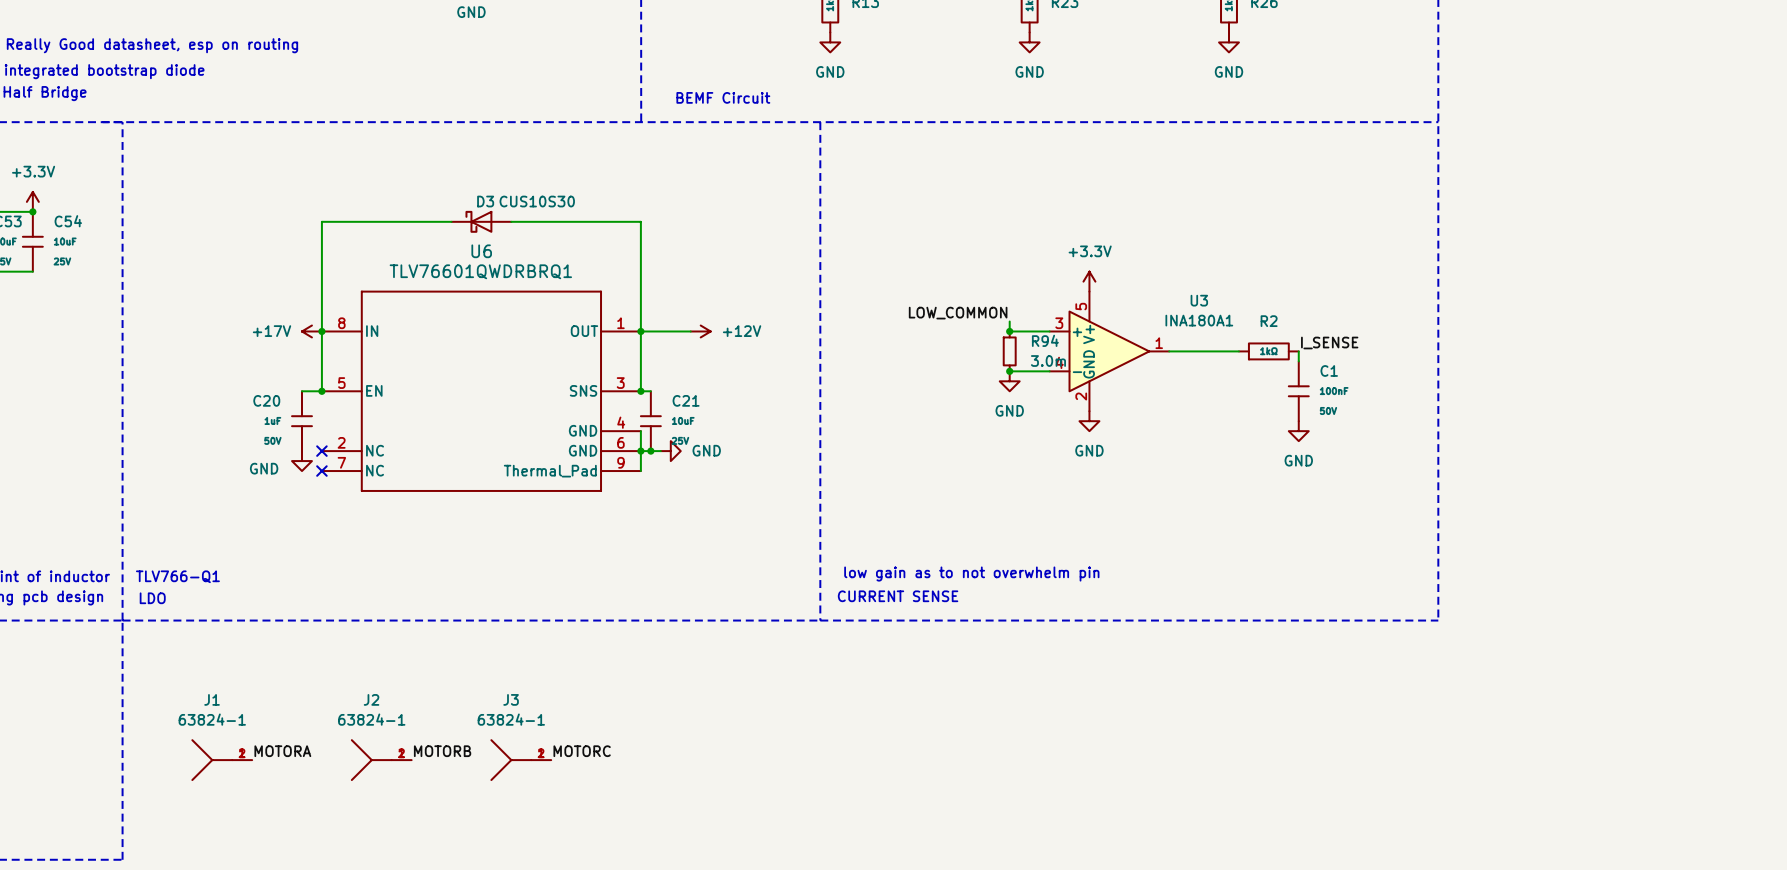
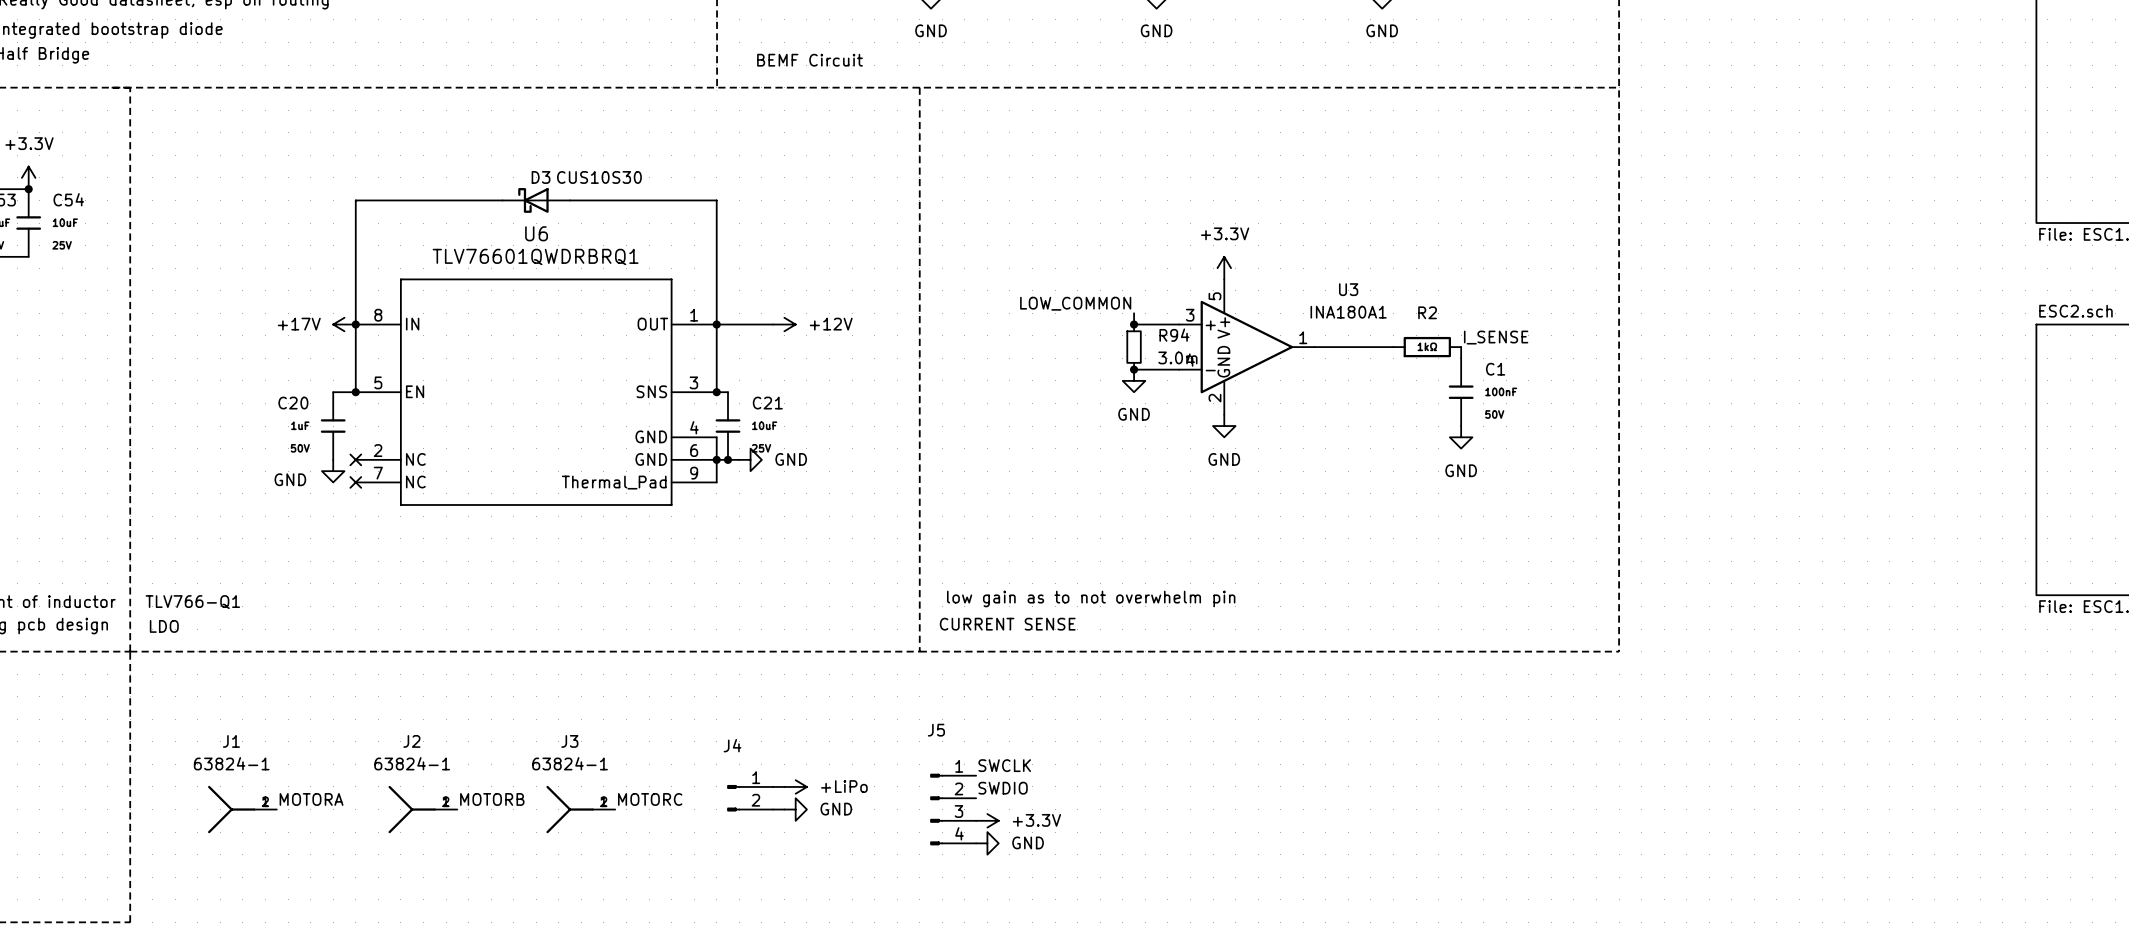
label: none -> SWCLK (1004, 765)
wire: none -> (773, 786) (784, 786)
power symbol: none -> +LiPo (795, 786)
label: none -> SWDIO (1003, 788)
J4: none -> (750, 798)
wire: none -> (773, 809) (784, 809)
power symbol: none -> GND (795, 809)
J5: none -> (953, 809)
power symbol: none -> +3.3V (987, 820)
power symbol: none -> GND (987, 843)

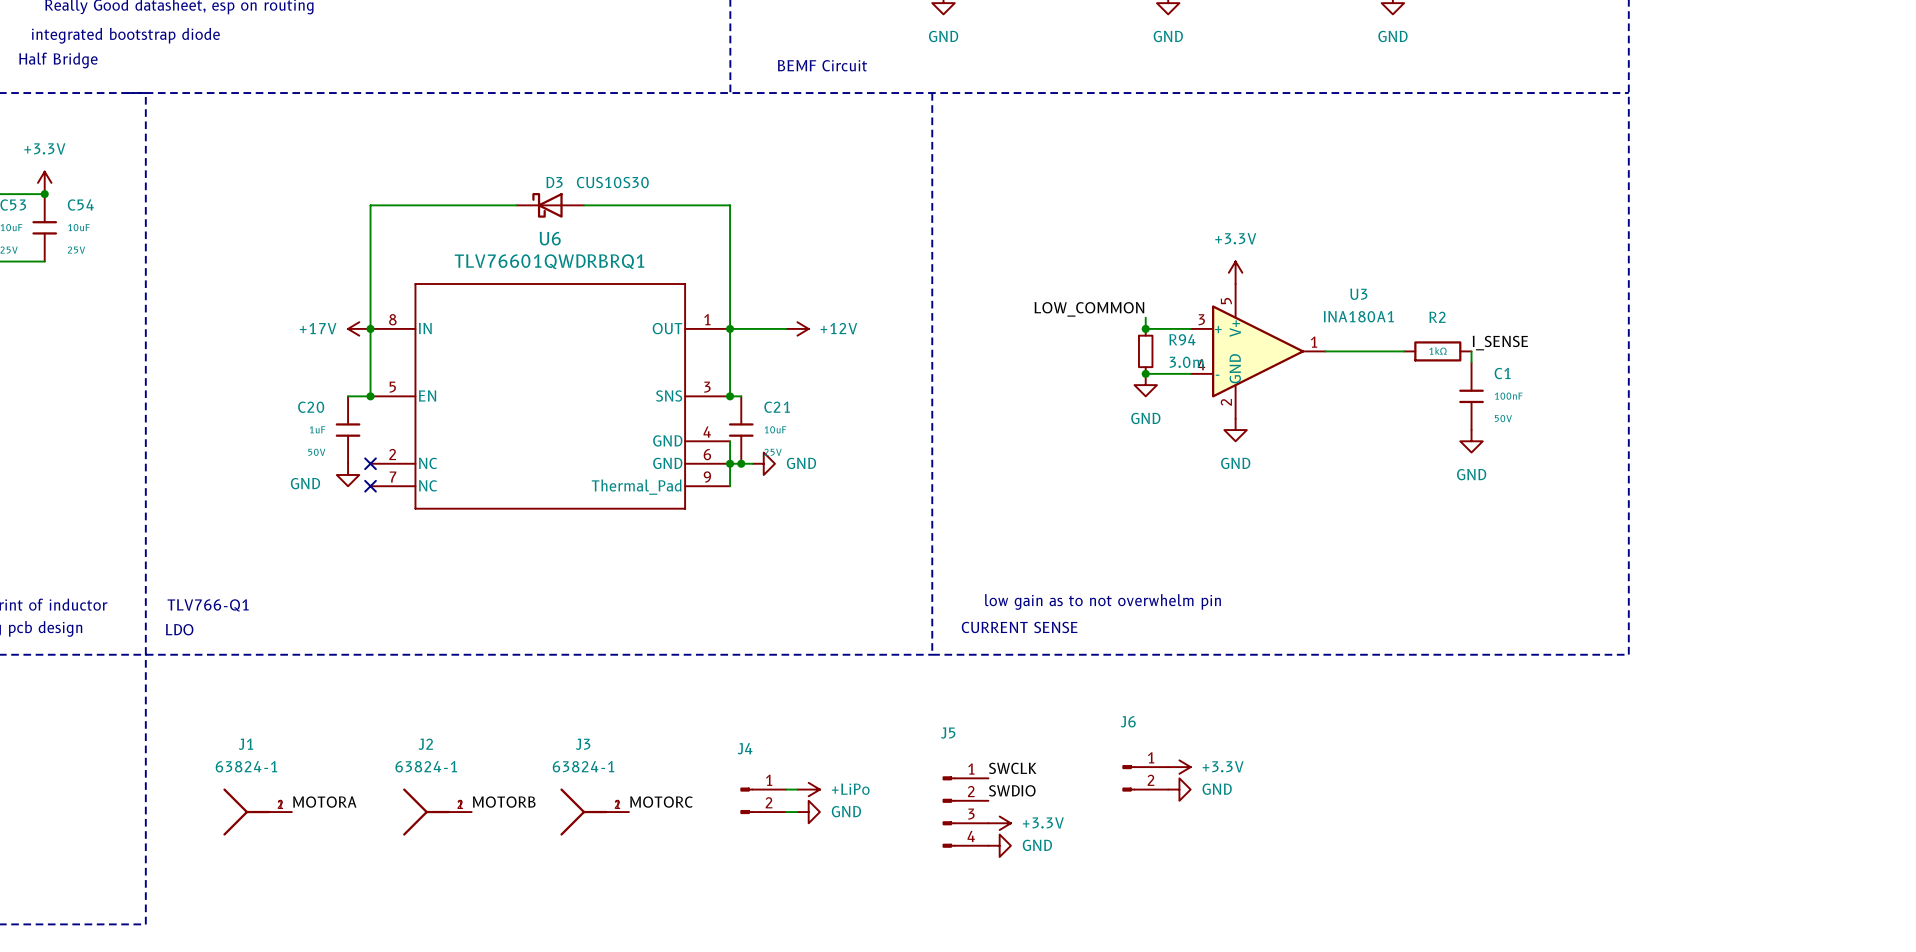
power symbol: none -> +3.3V (1179, 767)
J6: none -> (1145, 778)
power symbol: none -> GND (1179, 789)

